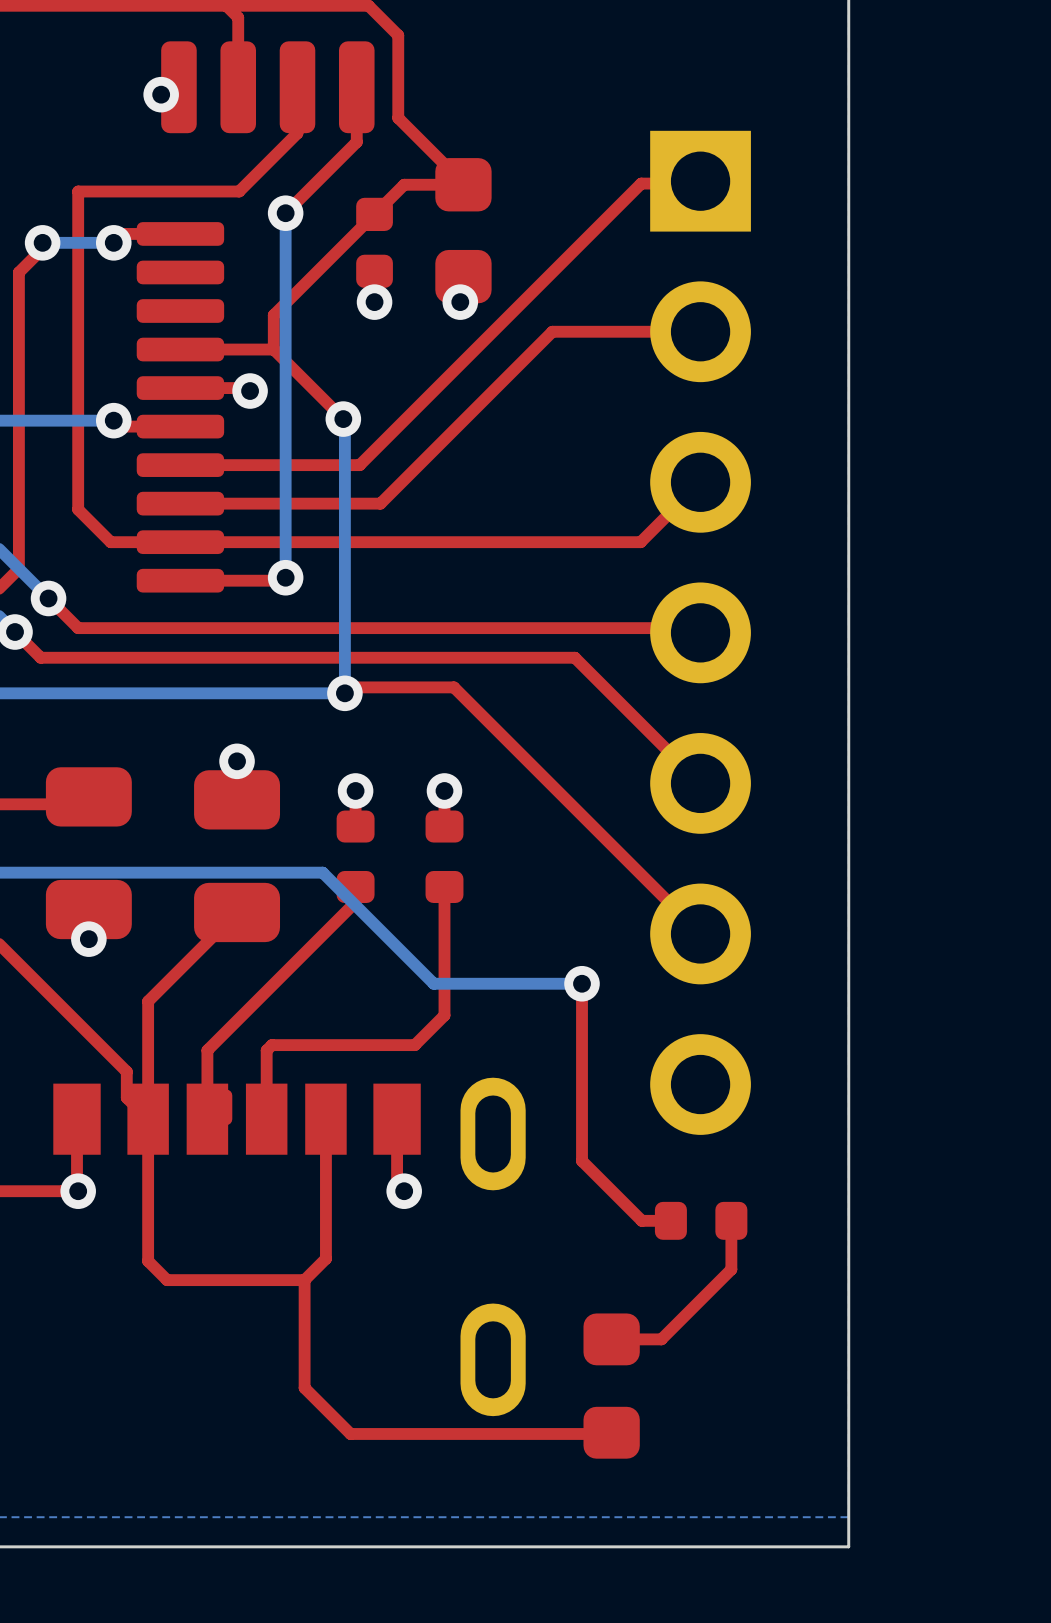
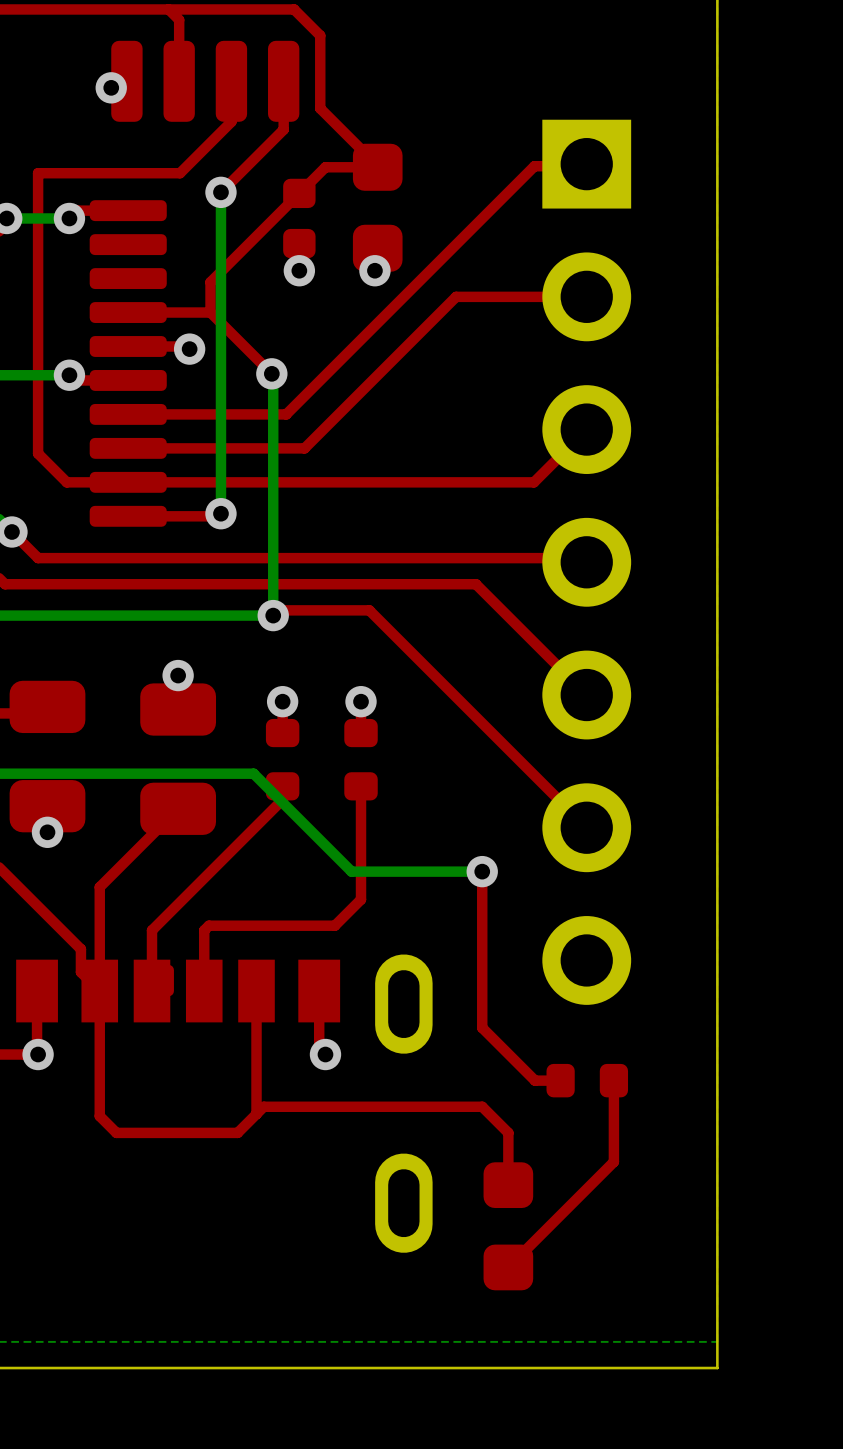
top track: none -> (256, 1114) (263, 1106) (482, 1106) (508, 1132) (508, 1185)
top track: (731, 1269) (661, 1339) (611, 1339) -> (613, 1123) (613, 1161) (508, 1267)
top track: (304, 1280) (304, 1387) (350, 1433) (610, 1433) -> none

